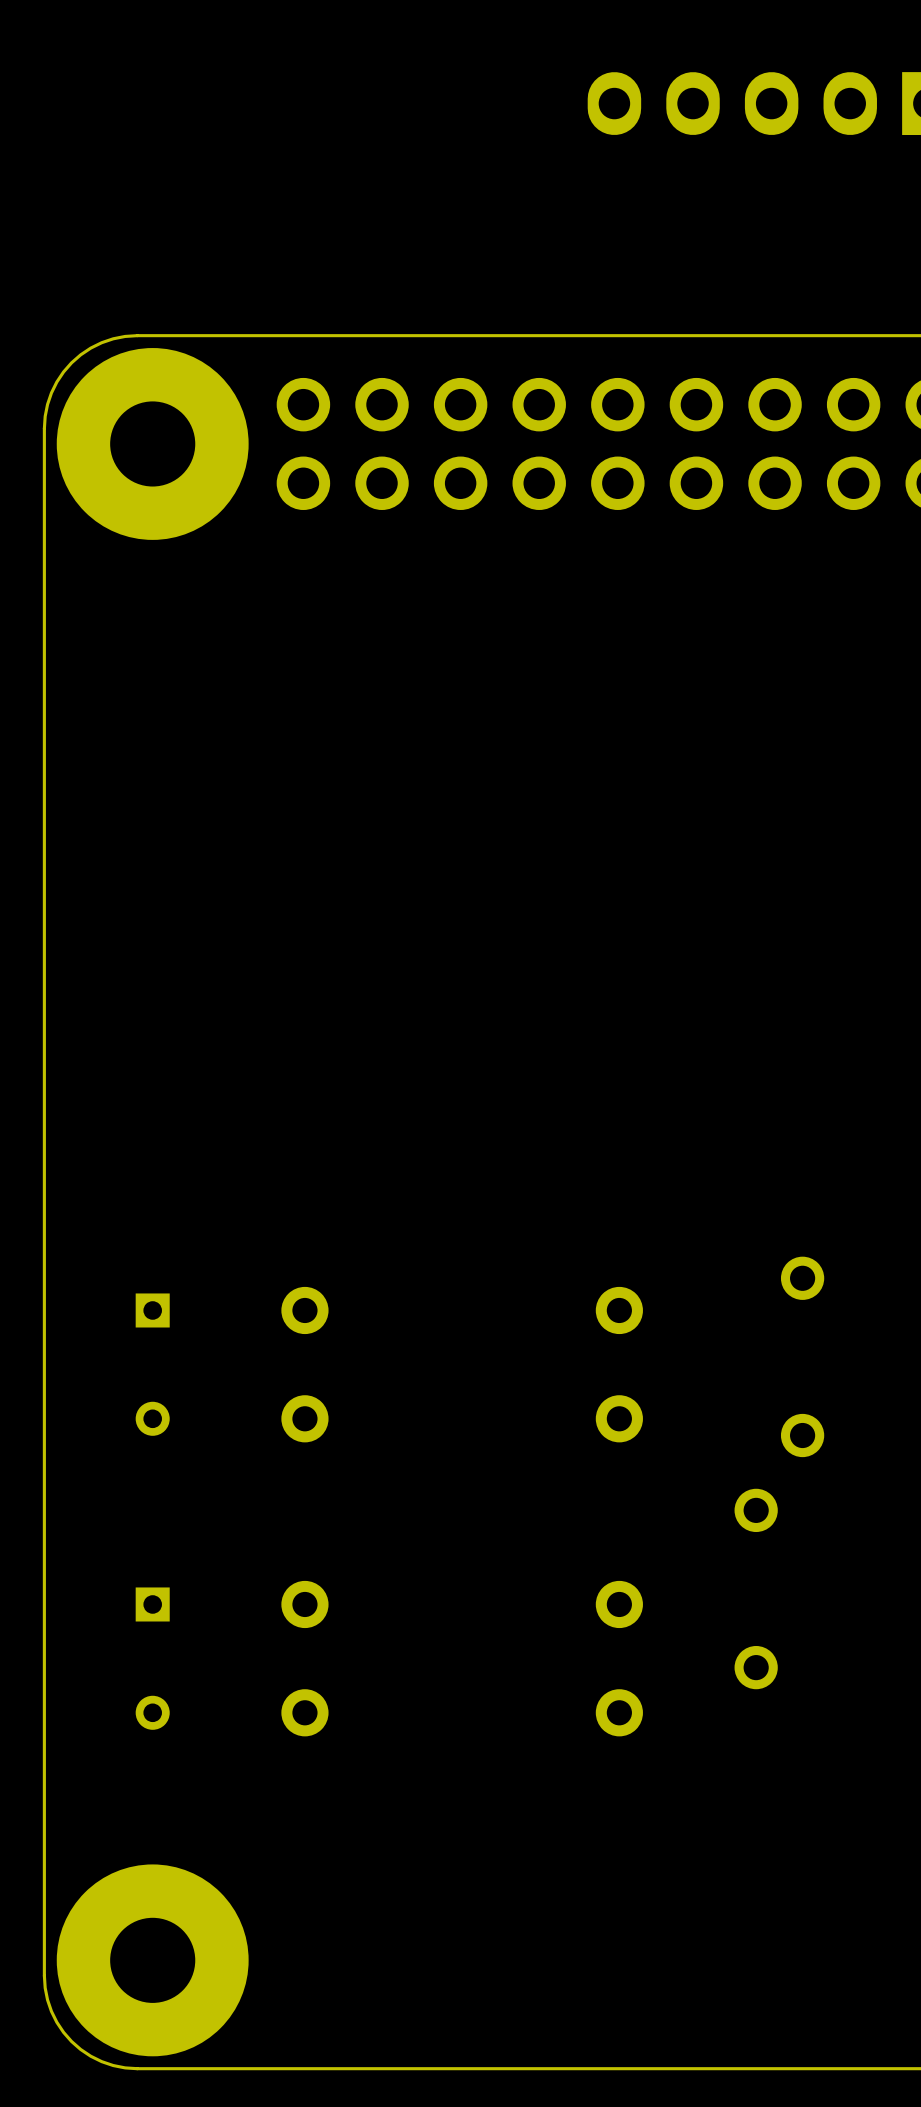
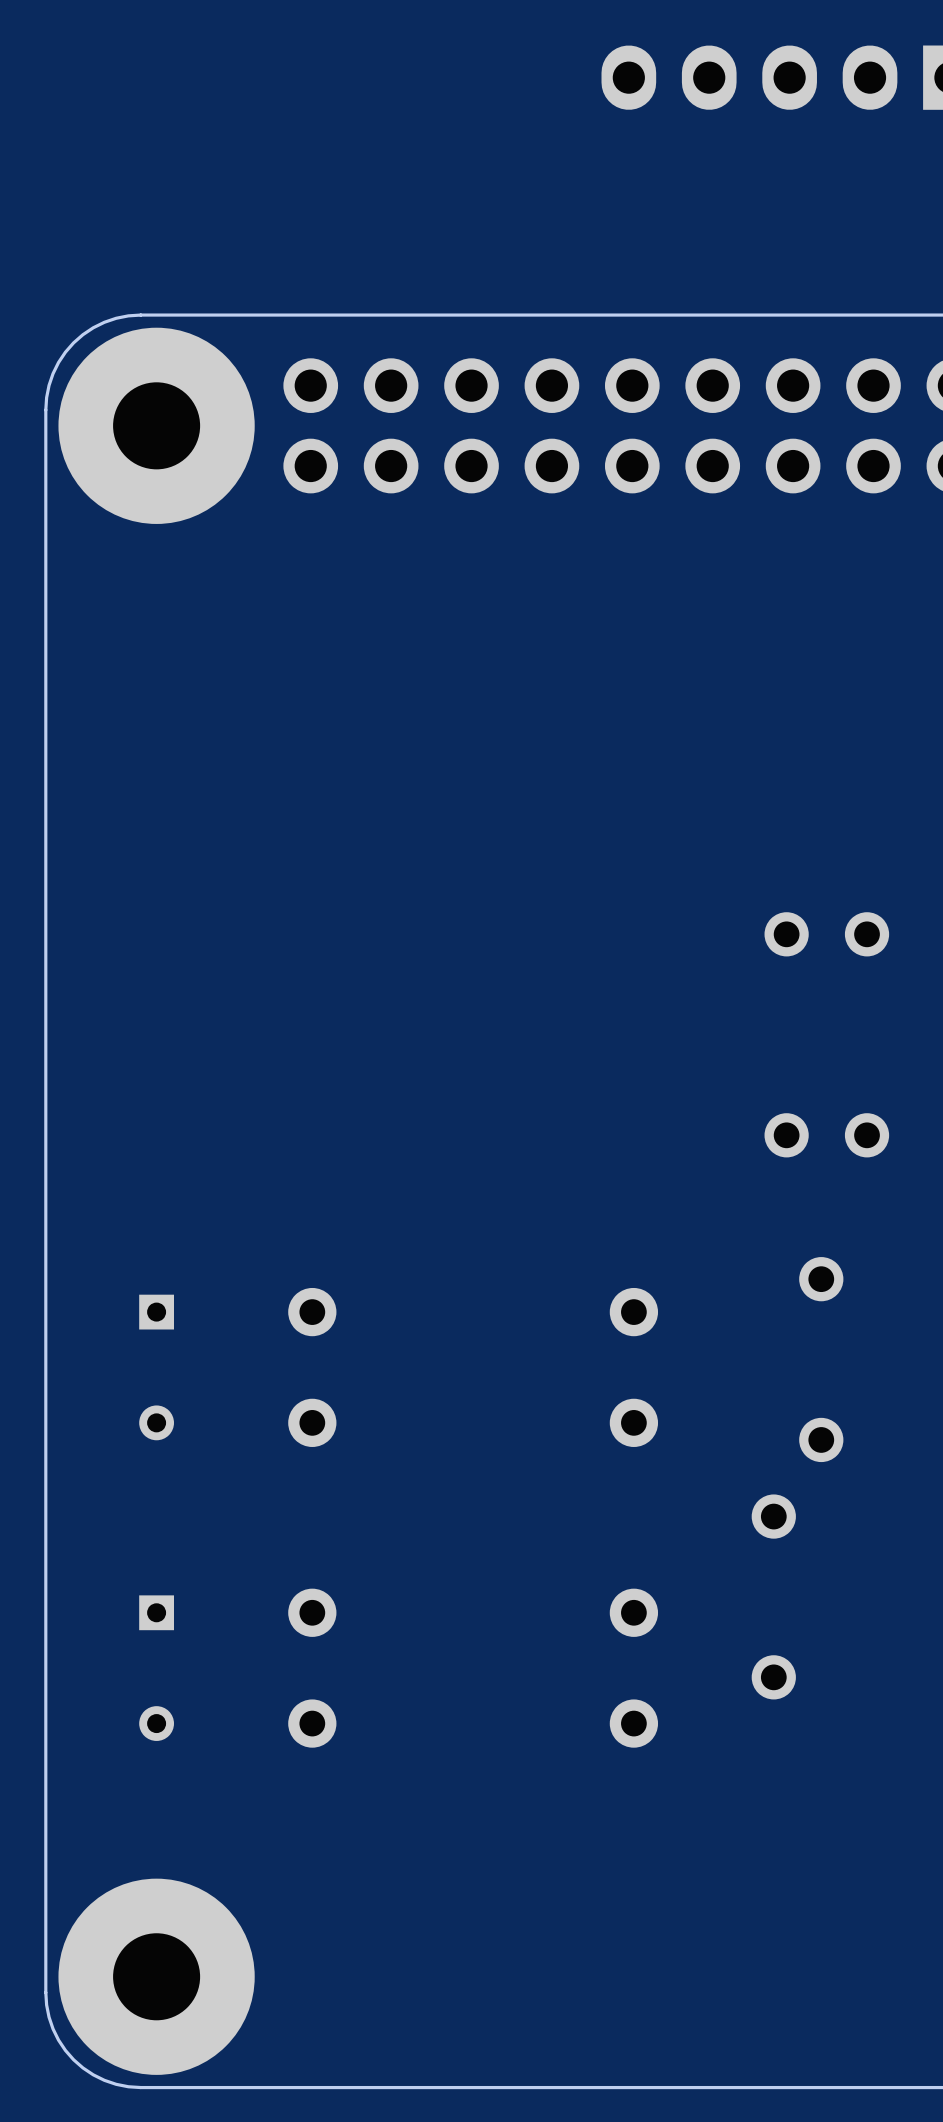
part: none -> (826, 934)
part: none -> (826, 1135)

